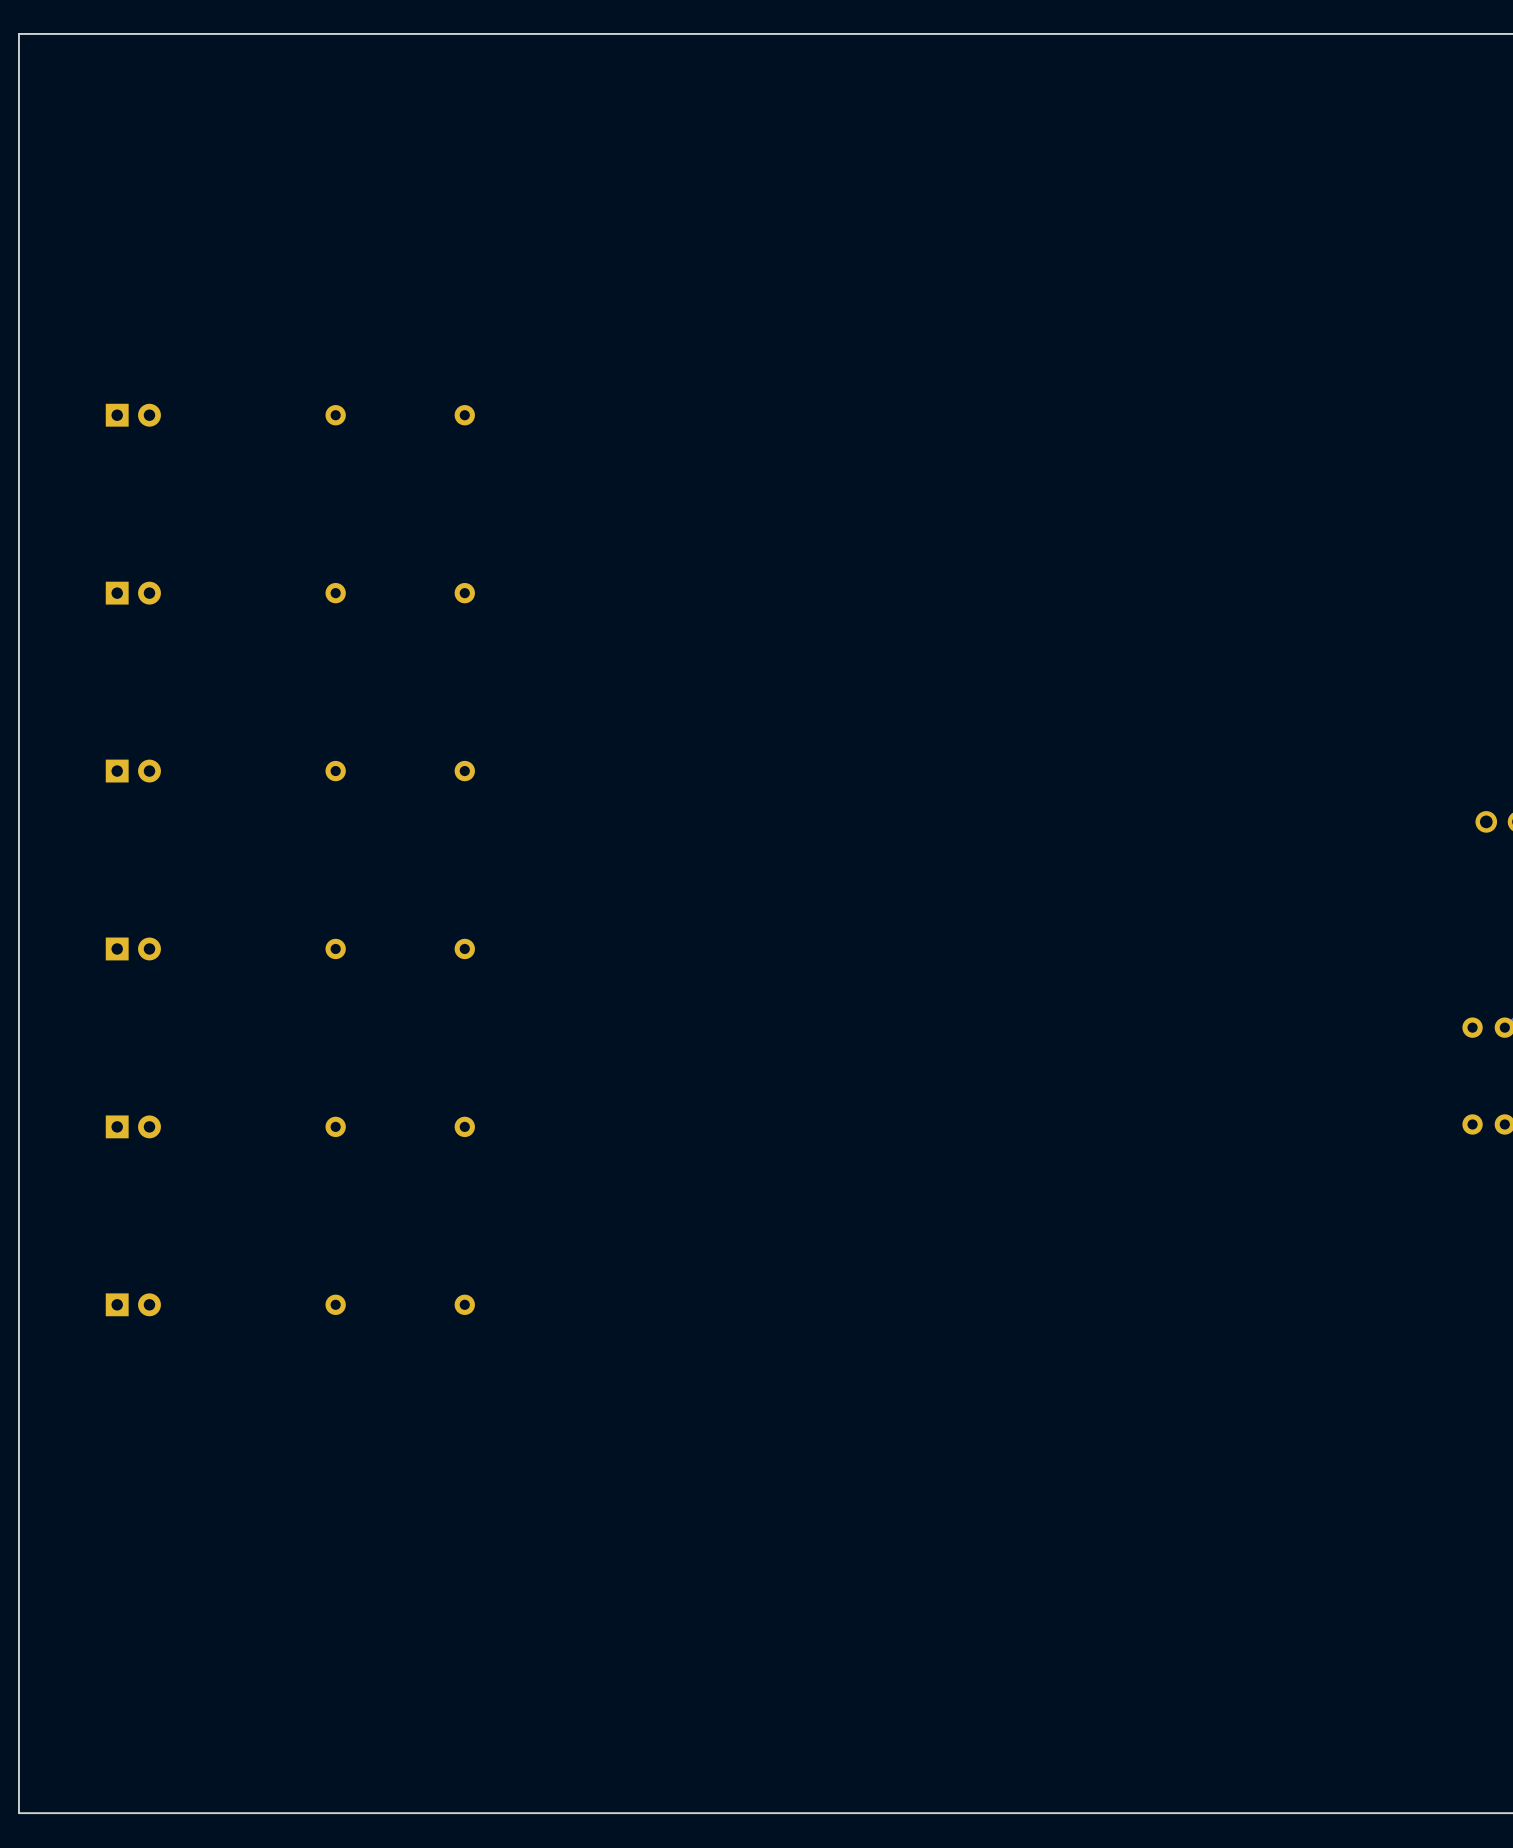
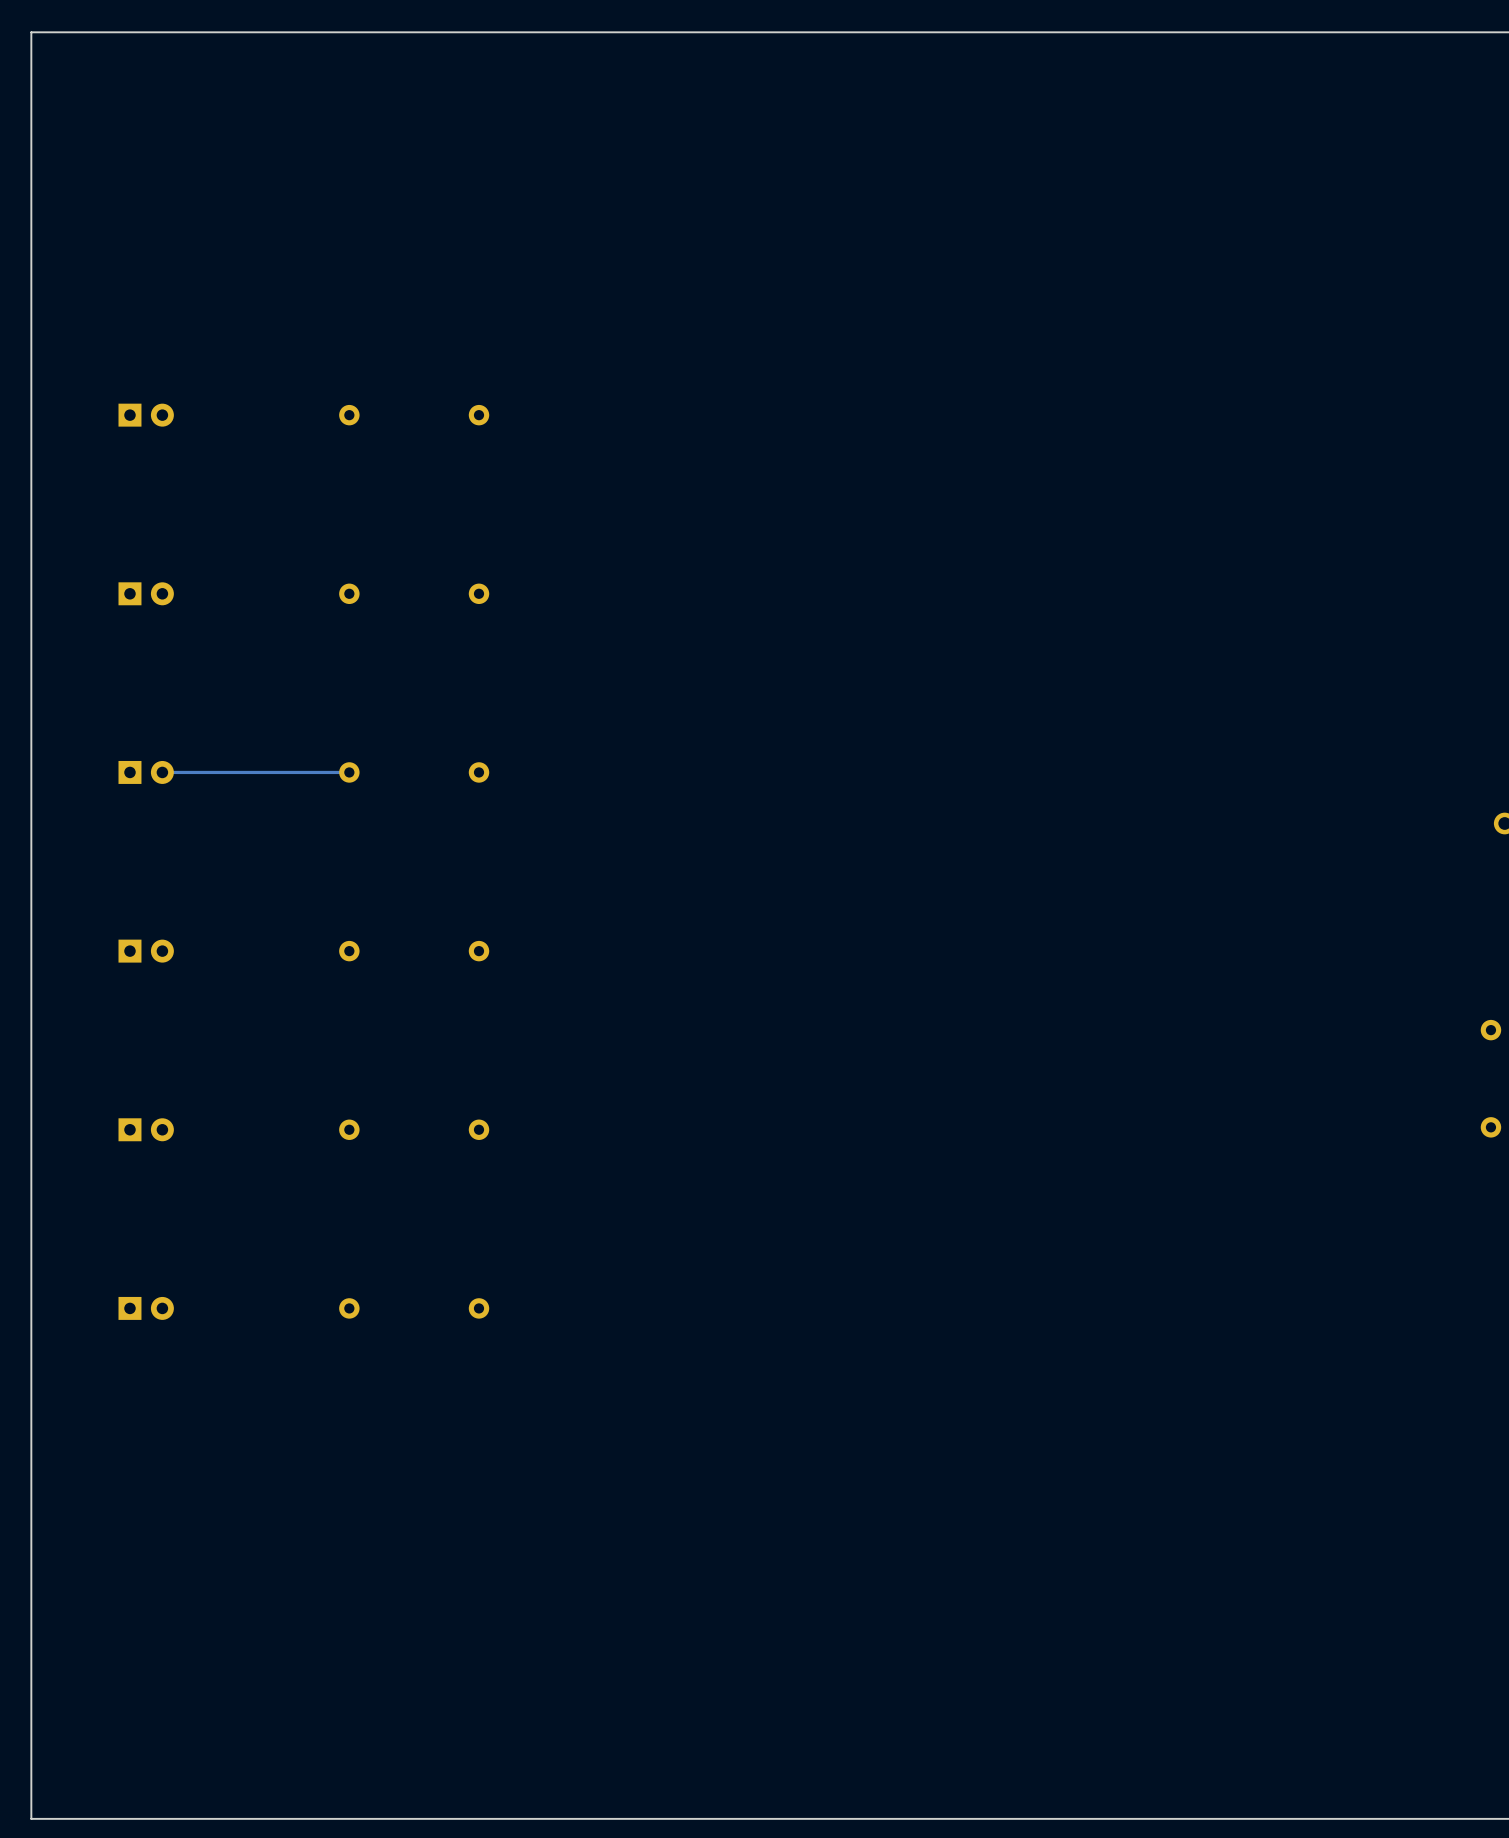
track: none -> (349, 772) (162, 772)

